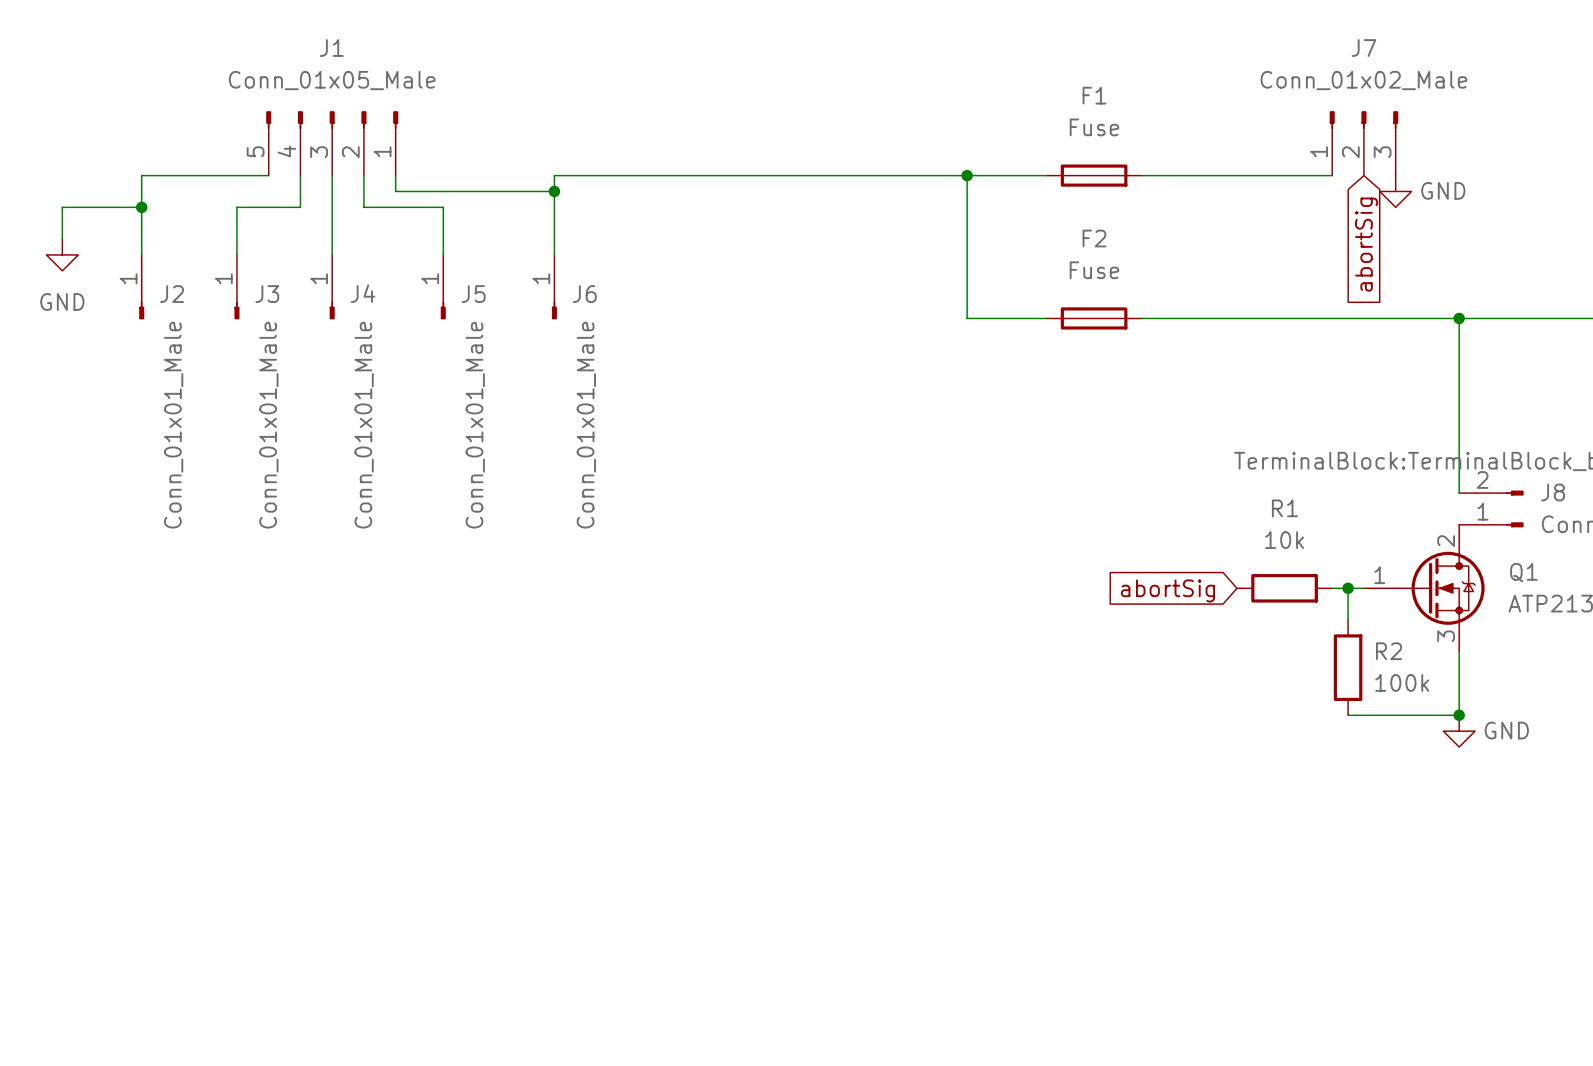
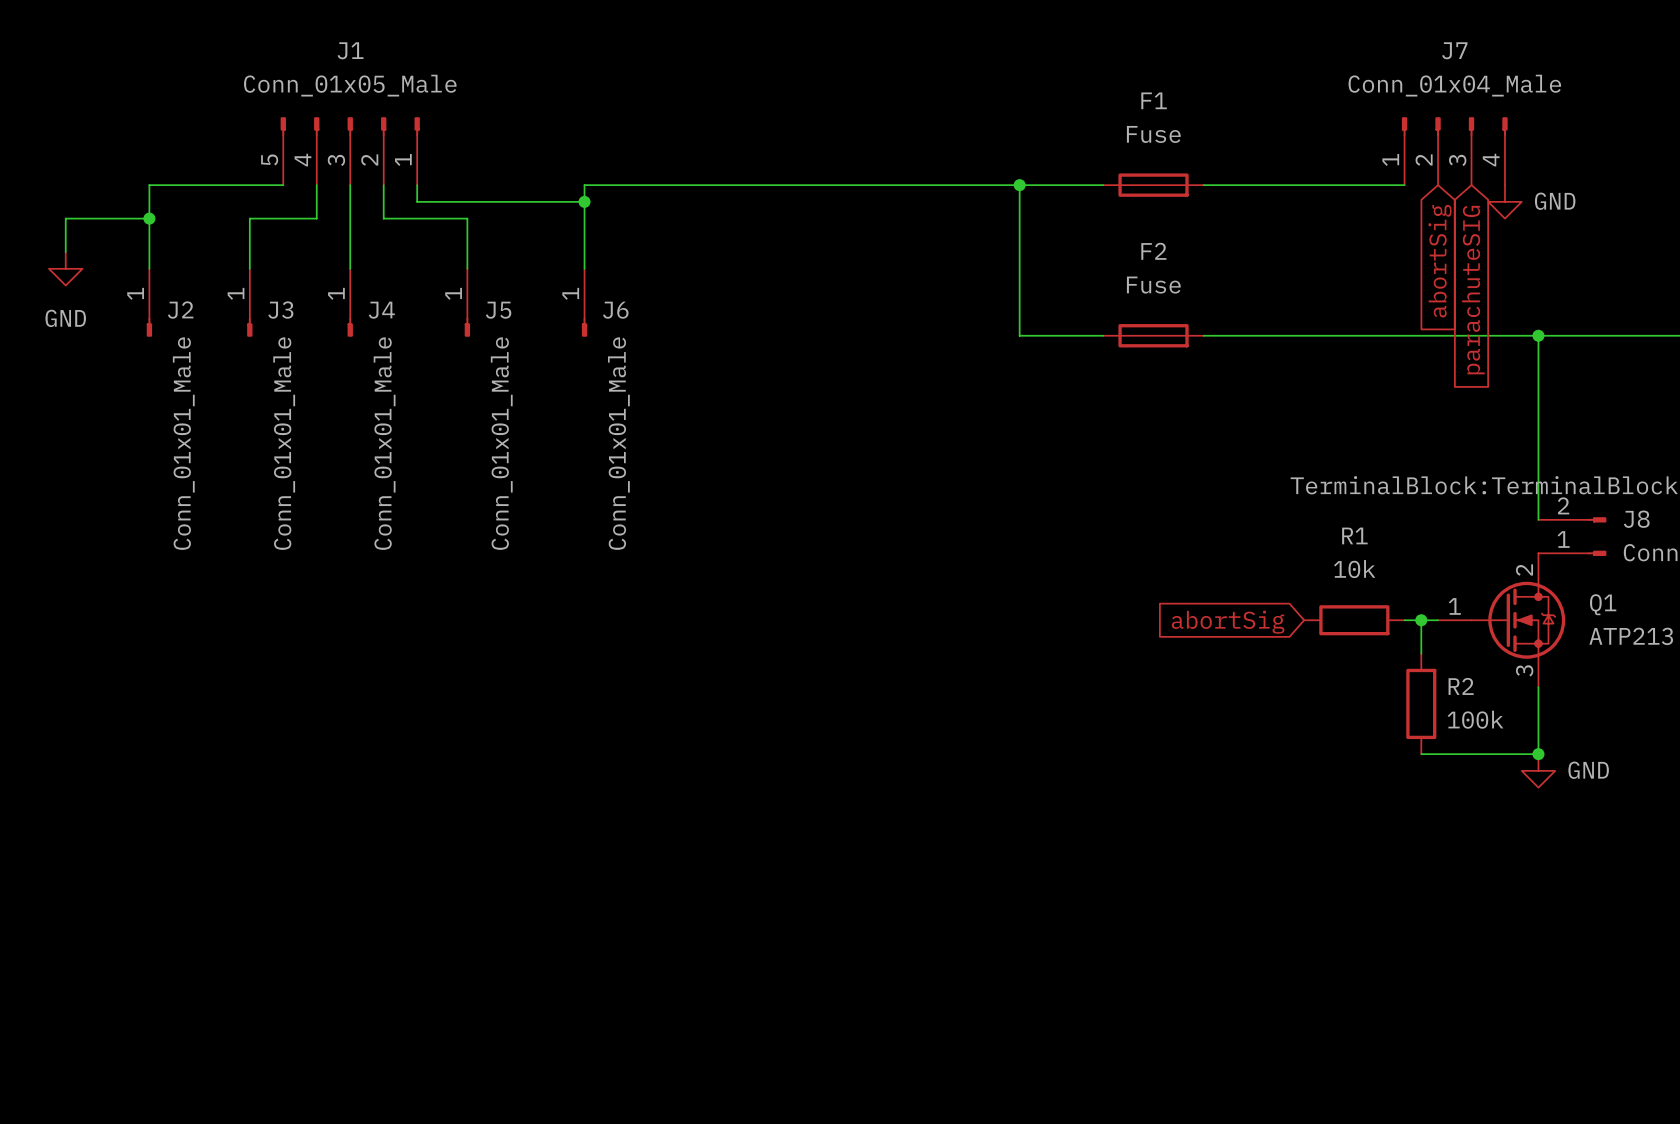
J7 value: Conn_01x02_Male (1363, 80) -> Conn_01x04_Male (1454, 85)
J7 symbol: [1329, 111, 1399, 176] -> [1401, 117, 1508, 186]
power symbol position: GND (1395, 191) -> GND (1504, 201)
global label: none -> parachuteSIG (1473, 290)

